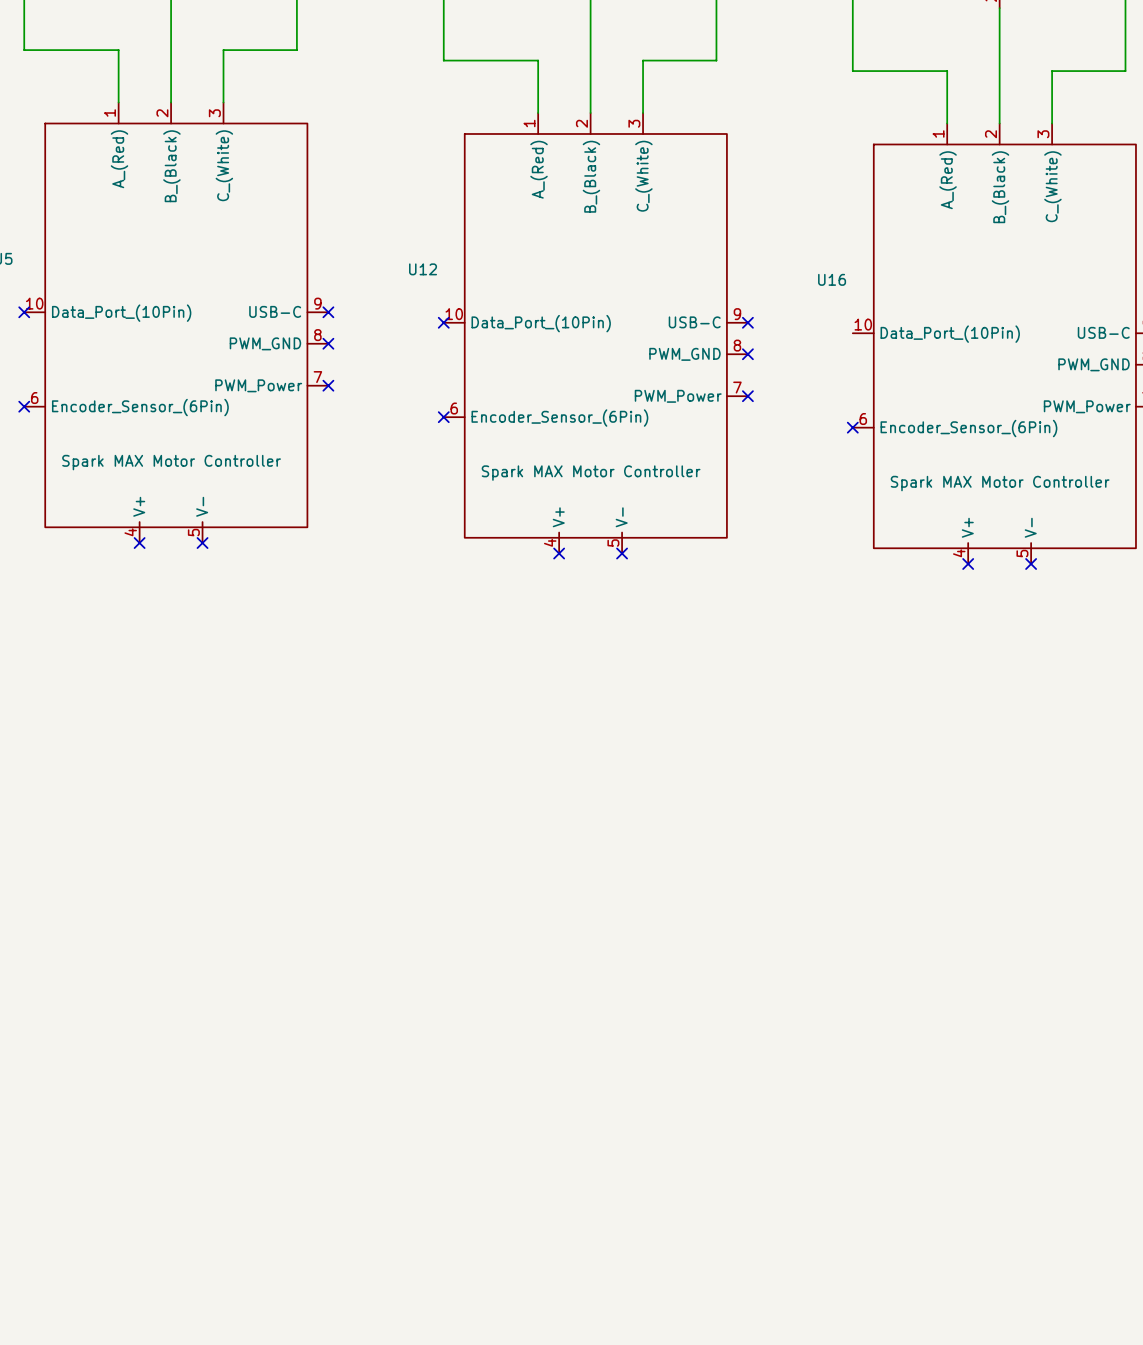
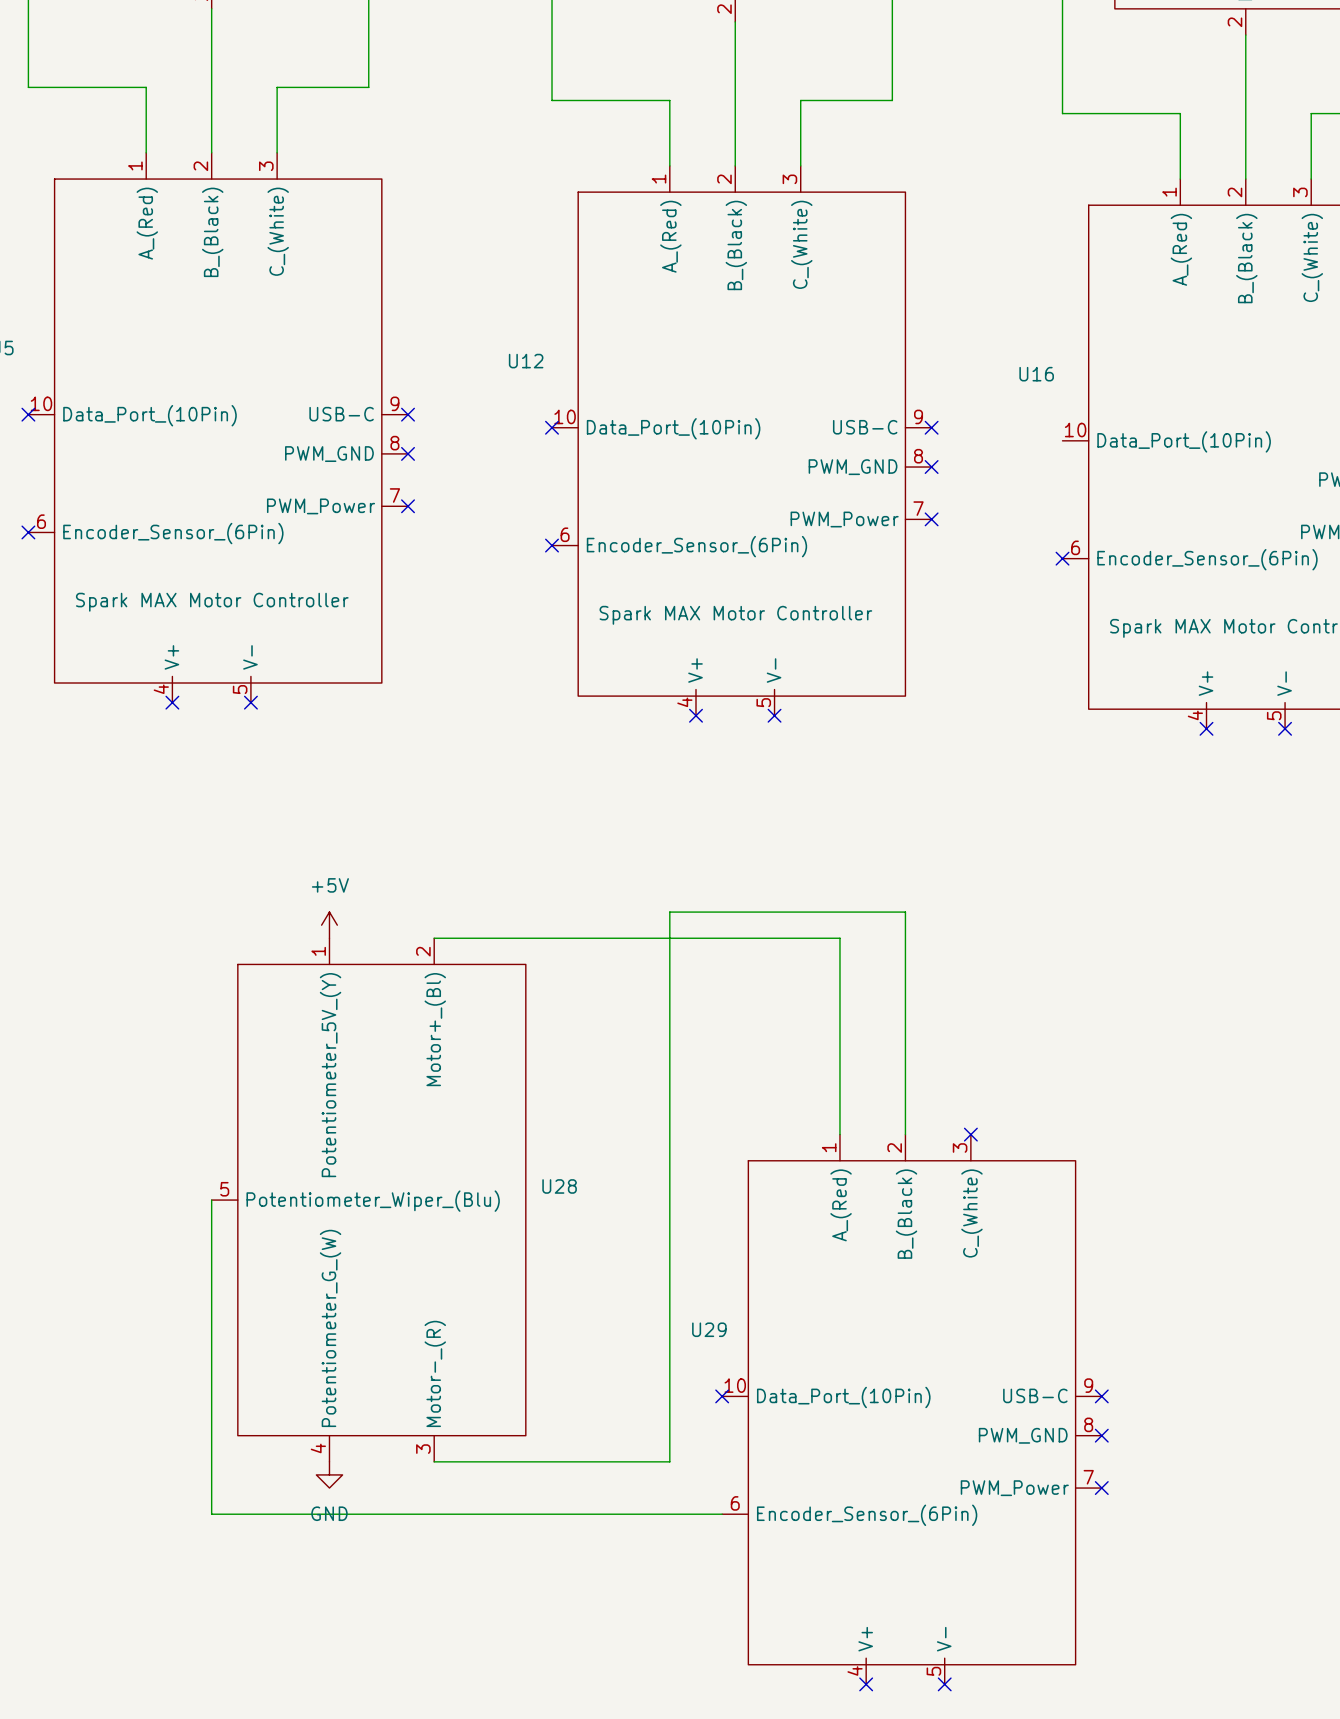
power symbol: none -> +5V (329, 925)
wire: none -> (434, 938) (839, 938) (839, 1134)
wire: none -> (905, 1134) (905, 912) (669, 912) (669, 1461) (434, 1461)
no-connect mark: none -> (970, 1134)
wire: none -> (211, 1200) (211, 1514) (722, 1514)
U28: none -> (368, 1200)
no-connect mark: none -> (722, 1396)
no-connect mark: none -> (1101, 1396)
U29: none -> (911, 1409)
no-connect mark: none -> (1101, 1435)
power symbol: none -> GND (329, 1474)
no-connect mark: none -> (1101, 1488)
no-connect mark: none -> (866, 1684)
no-connect mark: none -> (944, 1684)

